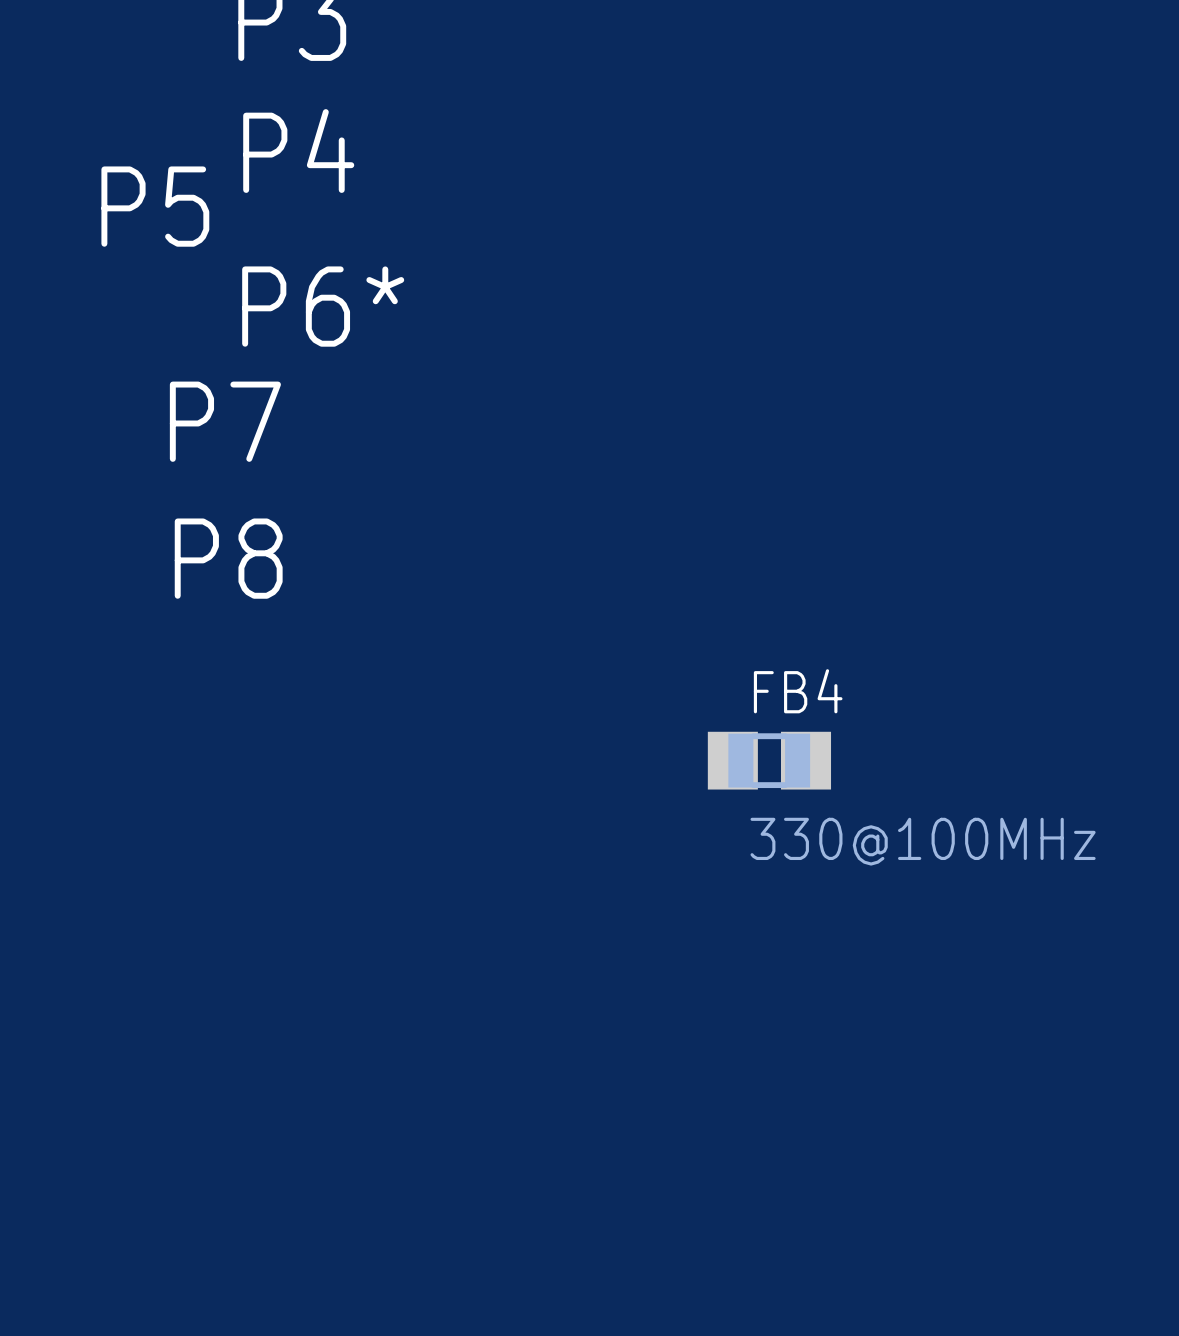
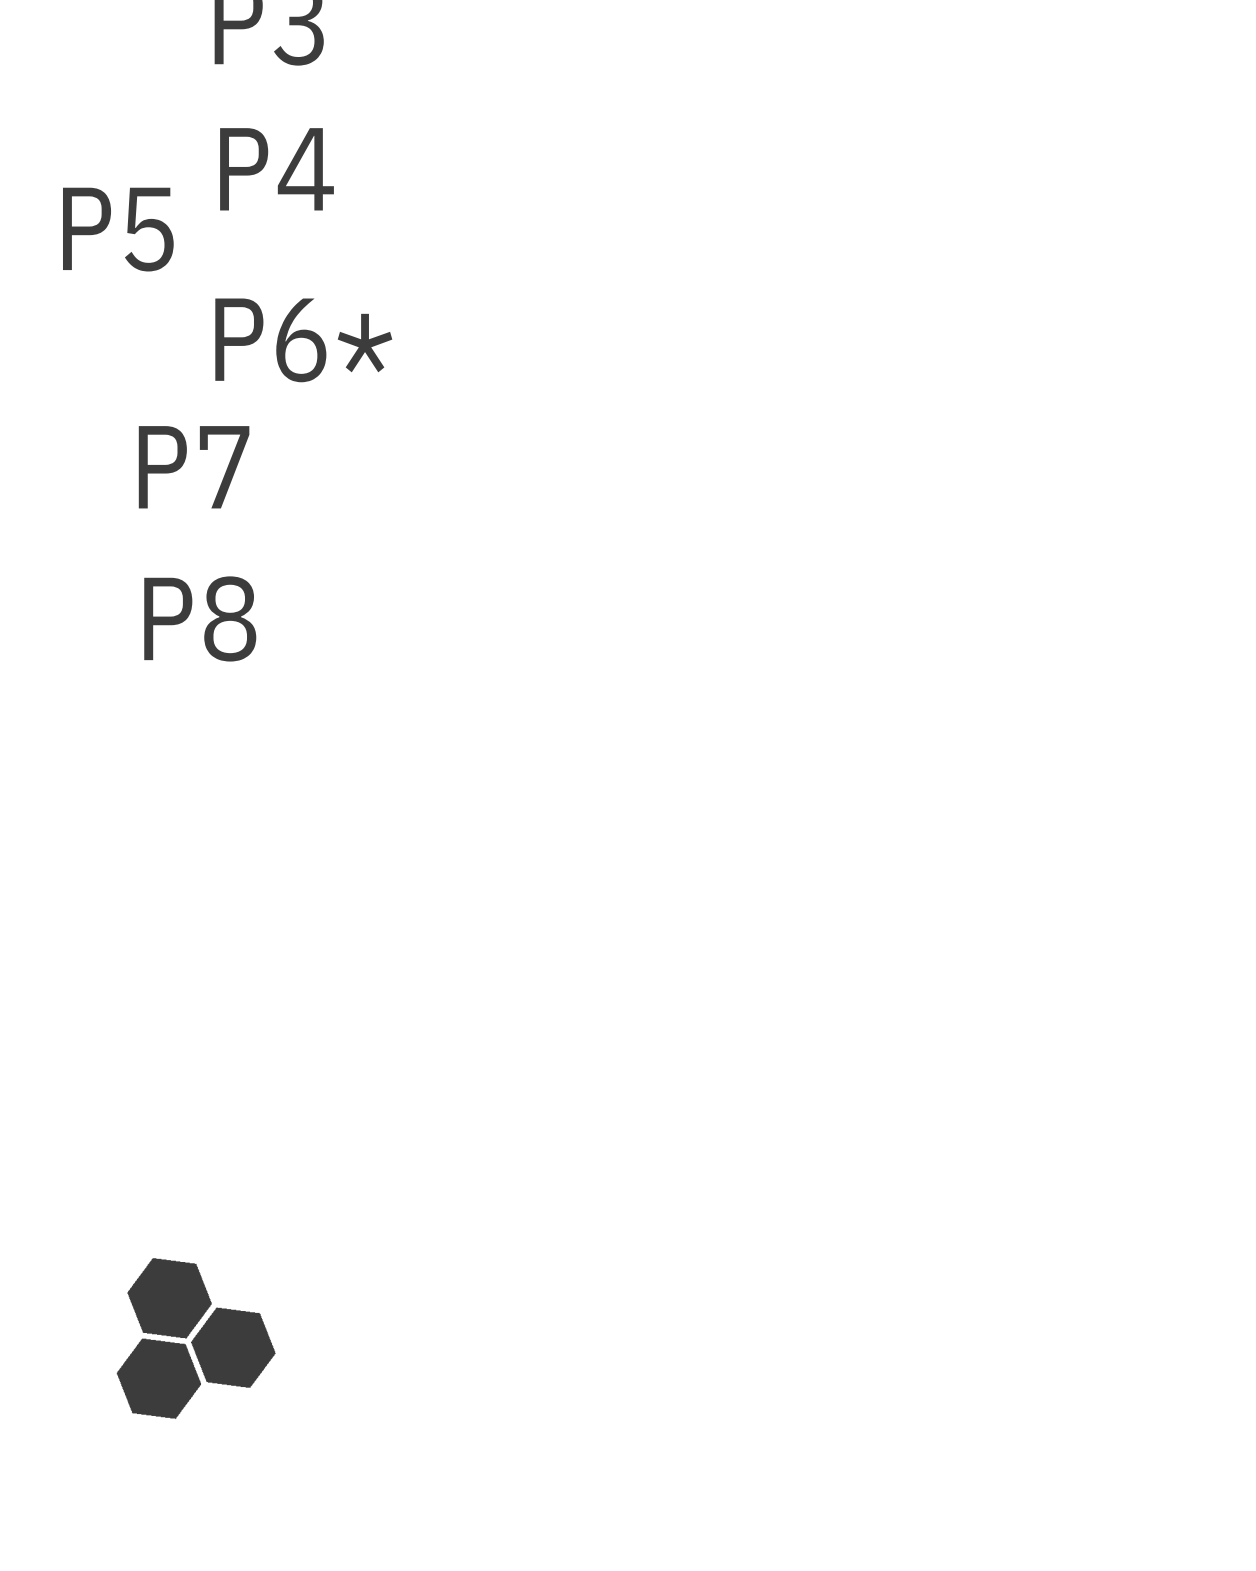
FB4: 330@100MHz (769, 760) -> none
drawing: none -> [116, 1258, 276, 1420]

